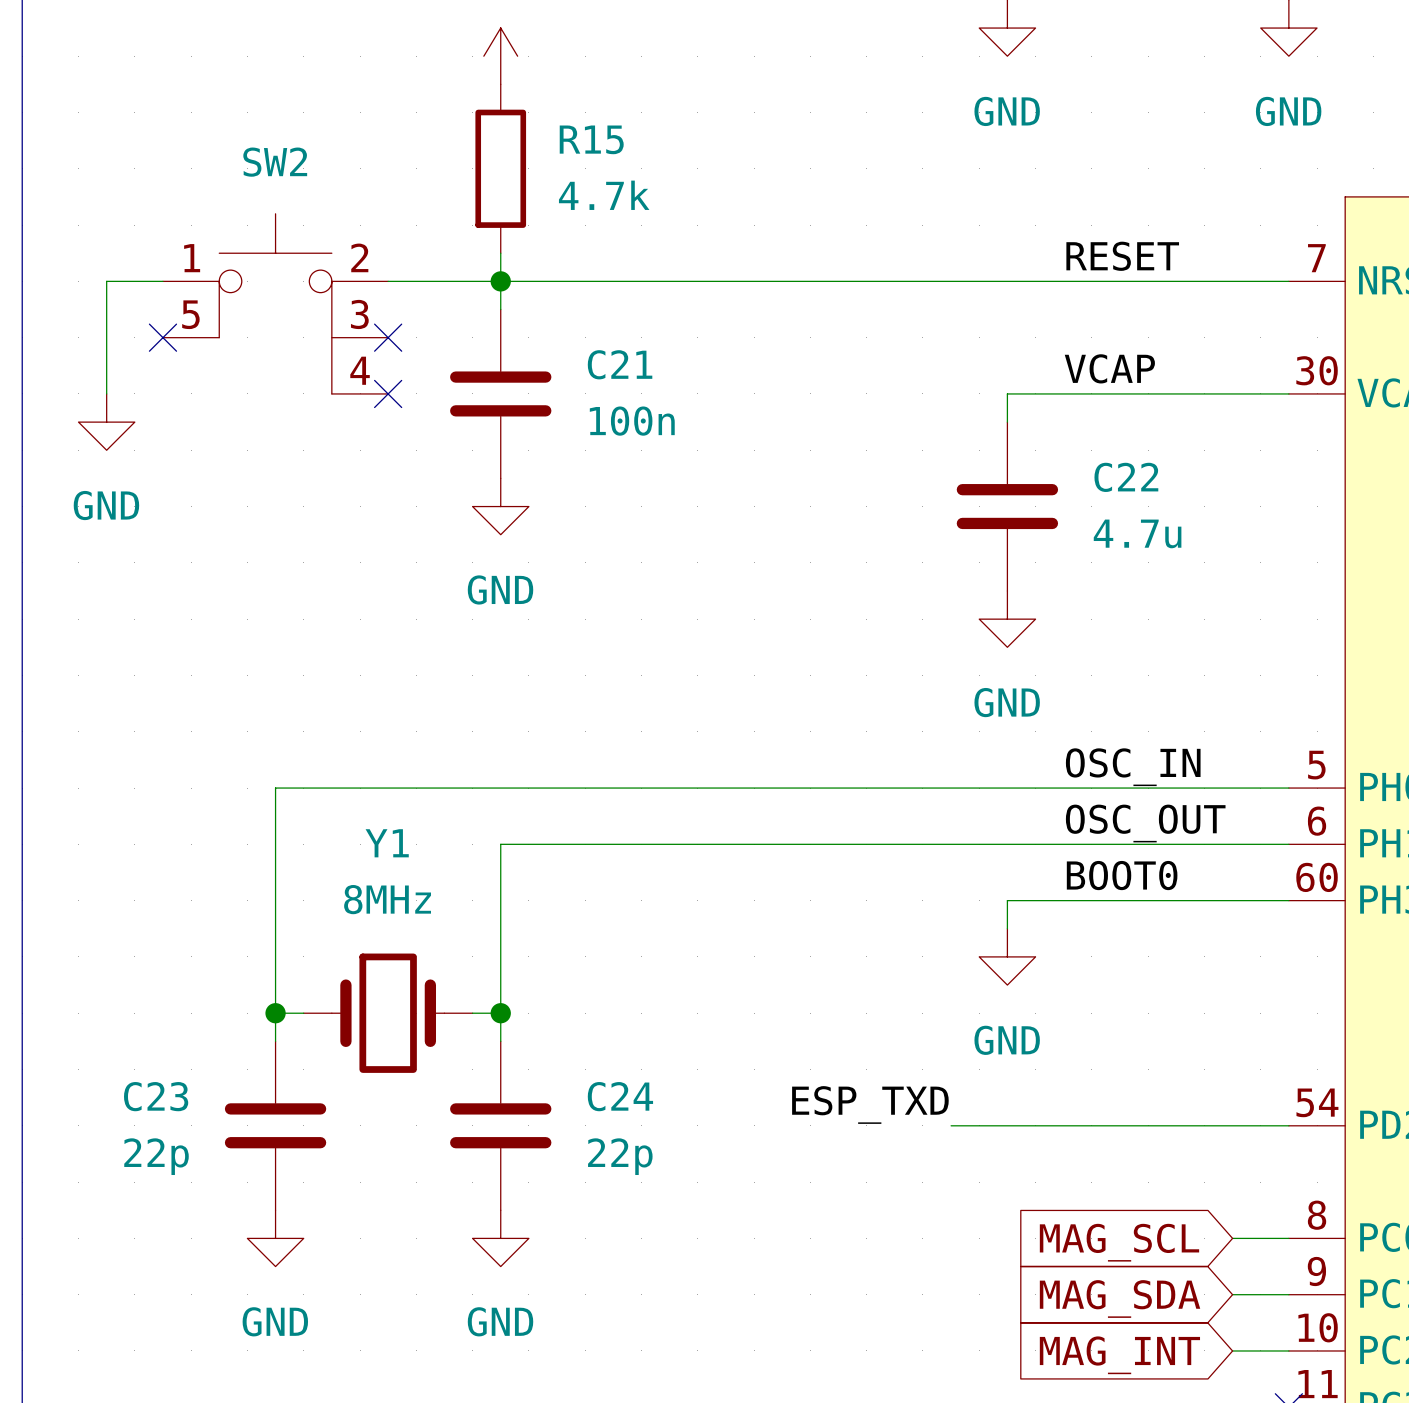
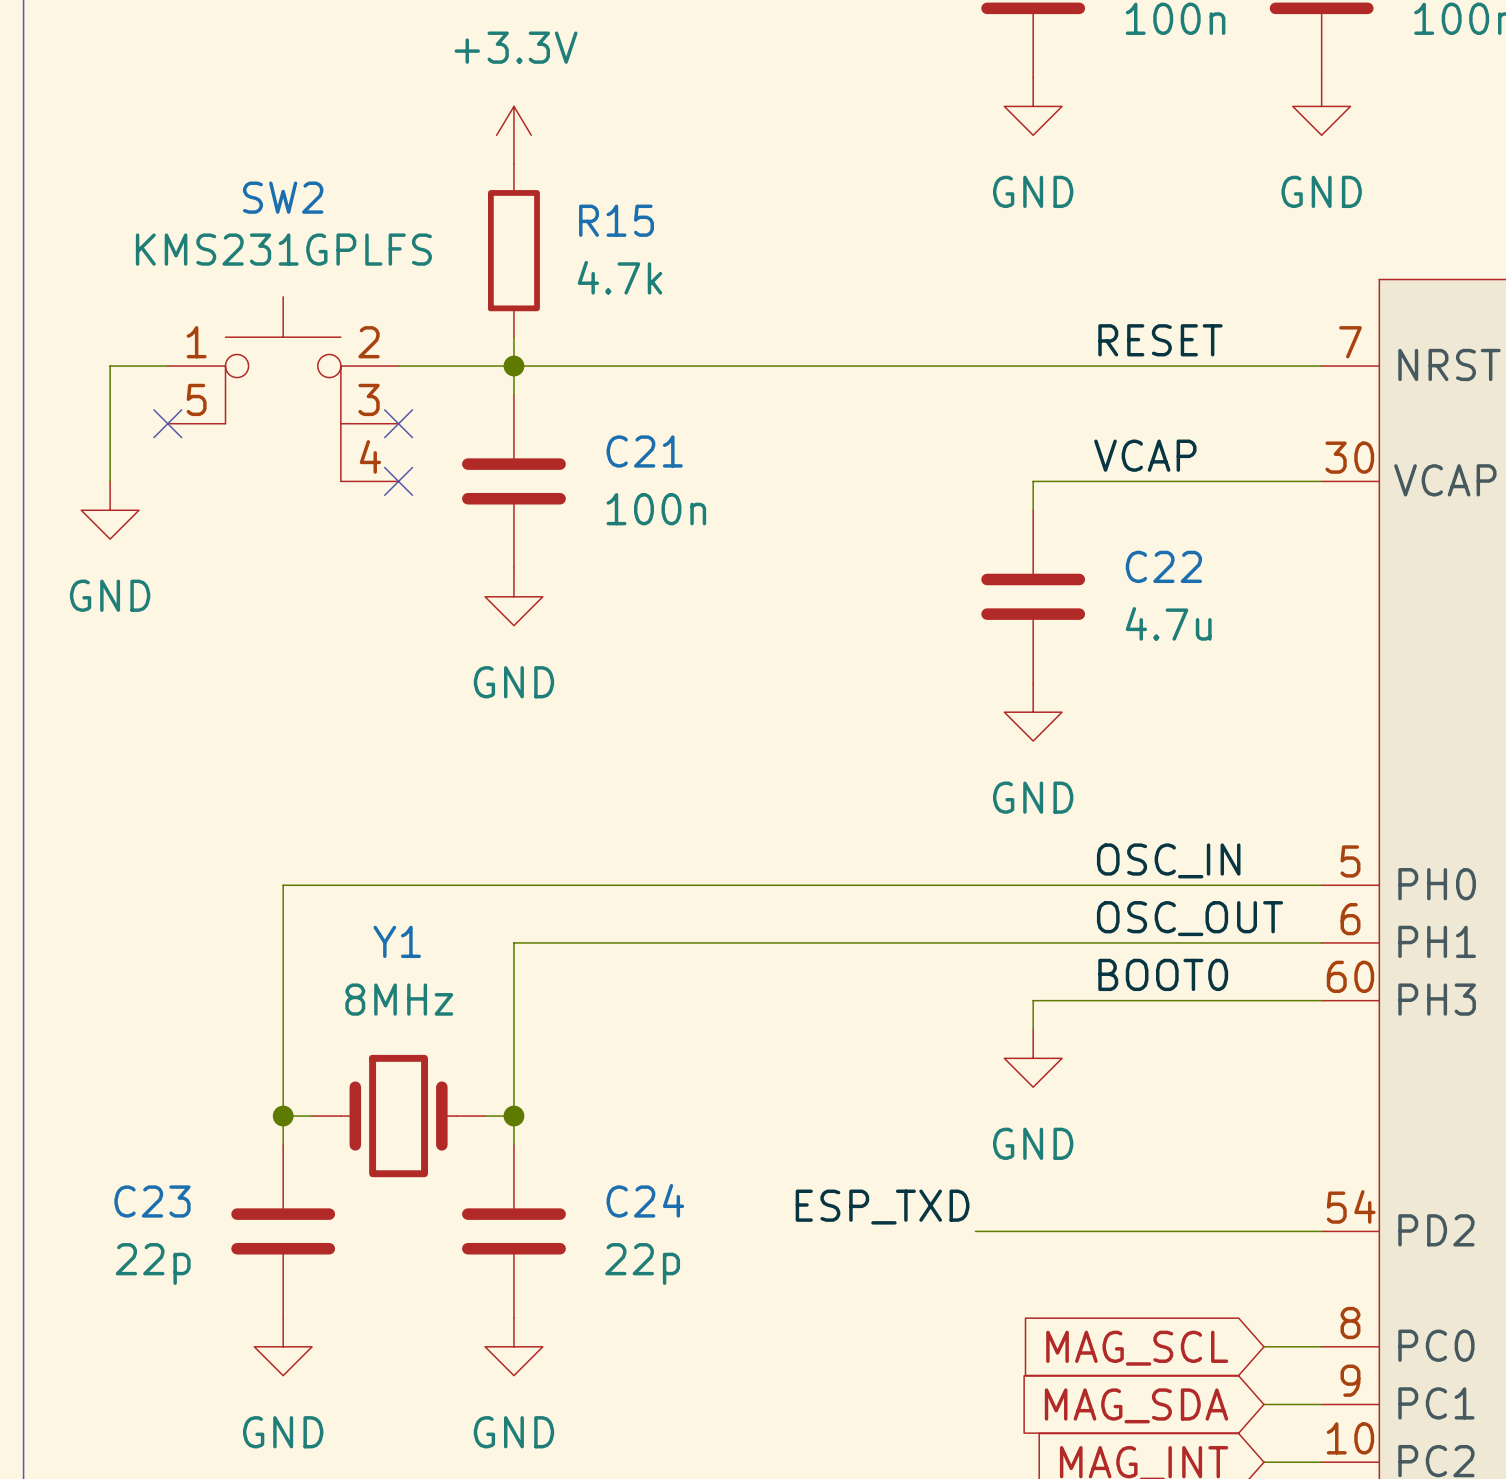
SW2 name position: SW2 (275, 162) -> SW2 (283, 197)
SW2 value: none -> KMS231GPLFS (283, 249)

